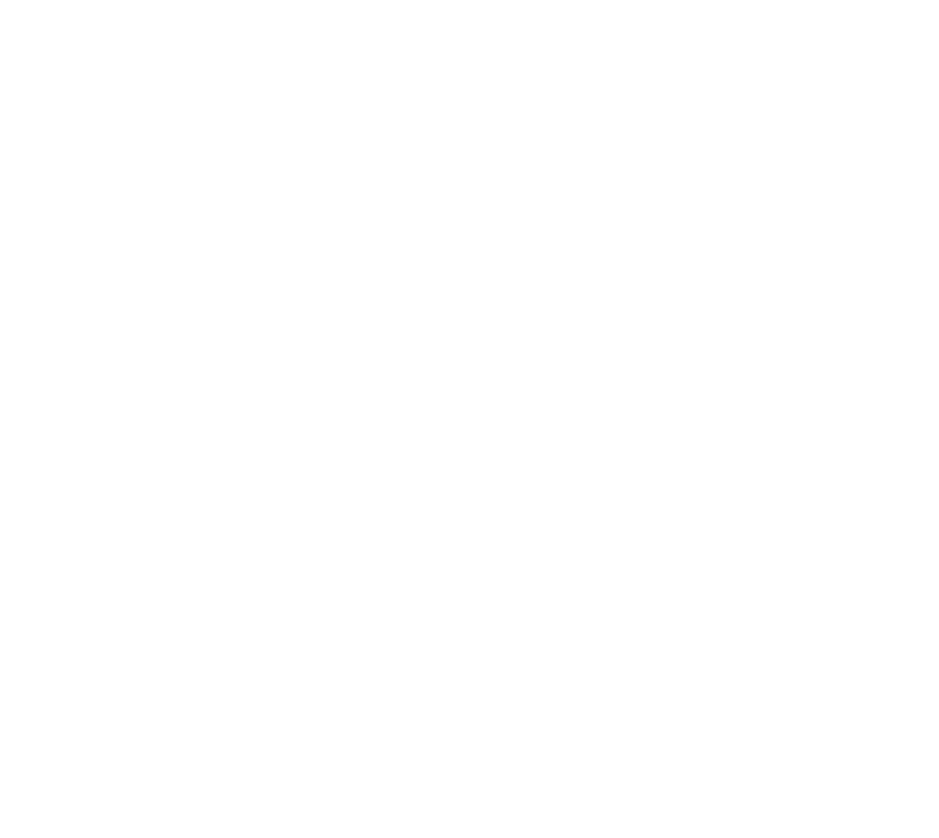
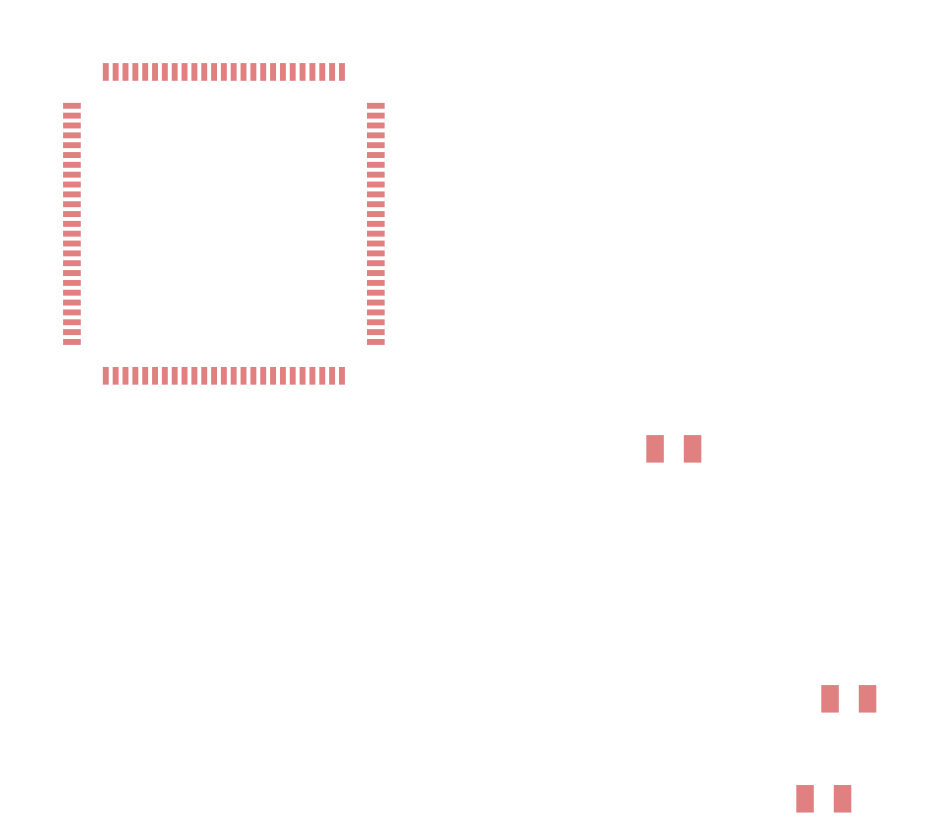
part: none -> (223, 223)
part: none -> (673, 448)
part: none -> (848, 698)
part: none -> (823, 798)

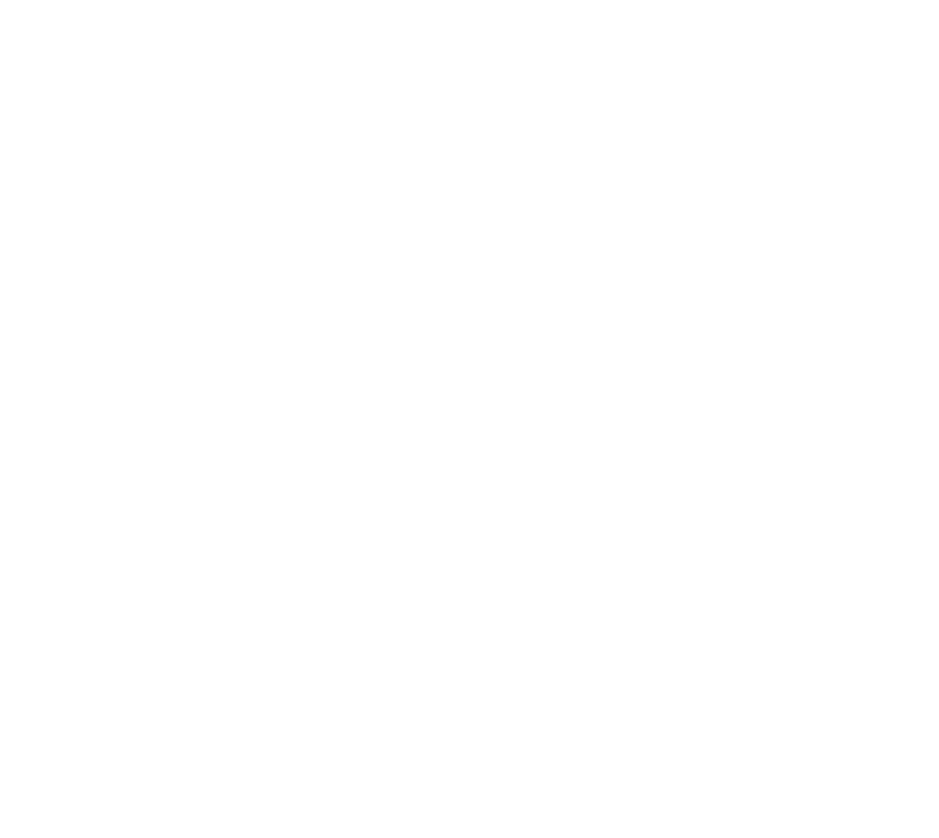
part: (223, 223) -> none
part: (673, 448) -> none
part: (848, 698) -> none
part: (823, 798) -> none

